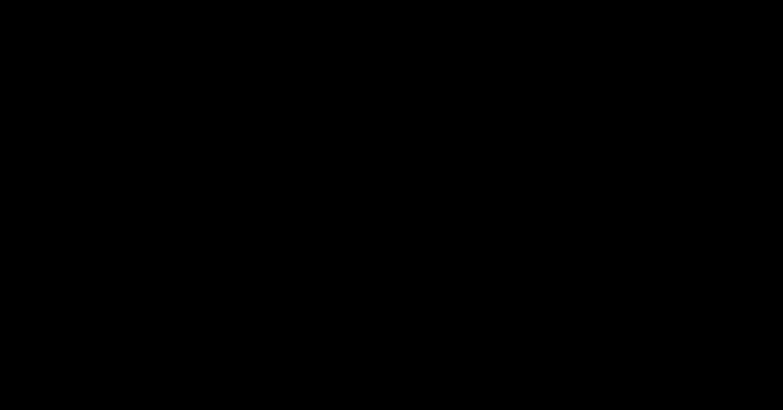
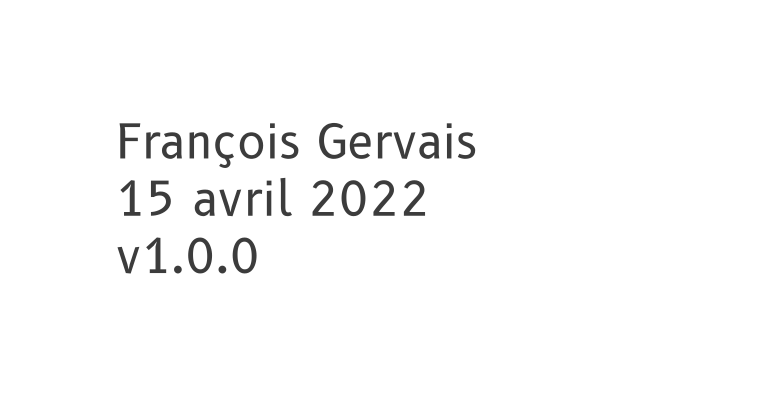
text: none -> François Gervais (297, 145)
text: none -> 15 avril 2022 (272, 197)
text: none -> v1.0.0 (187, 255)

